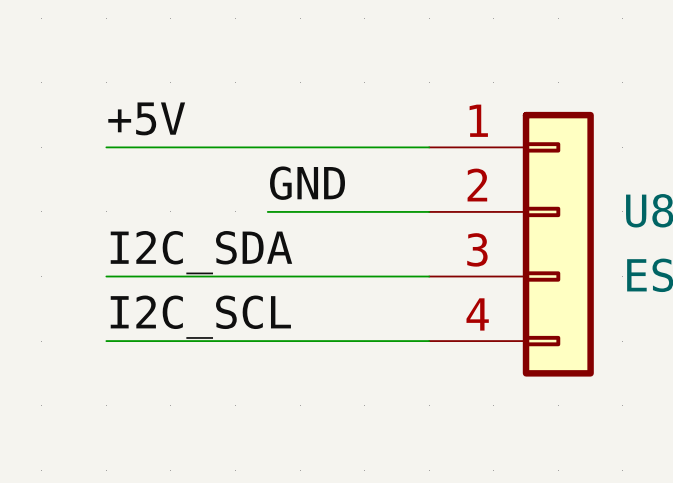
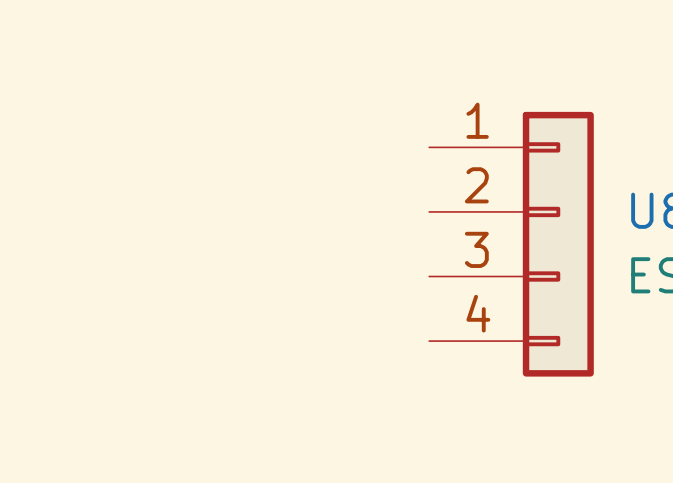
label: +5V (146, 118) -> none
wire: (106, 147) (429, 147) -> none
label: GND (307, 183) -> none
wire: (267, 211) (429, 211) -> none
label: I2C_SDA (201, 252) -> none
wire: (106, 276) (429, 276) -> none
label: I2C_SCL (200, 317) -> none
wire: (106, 341) (429, 341) -> none

